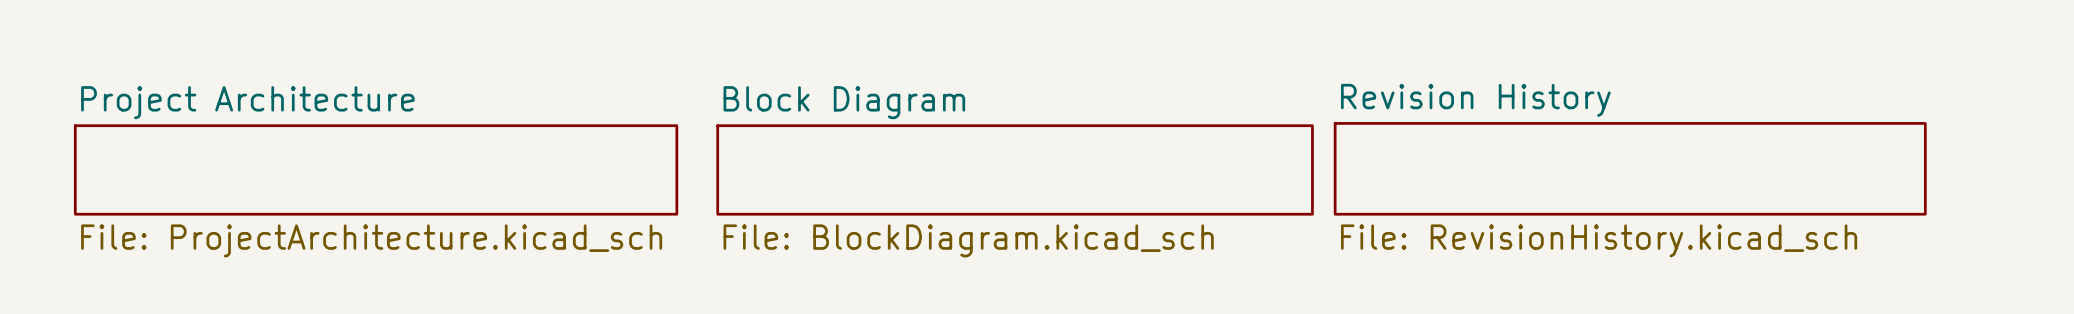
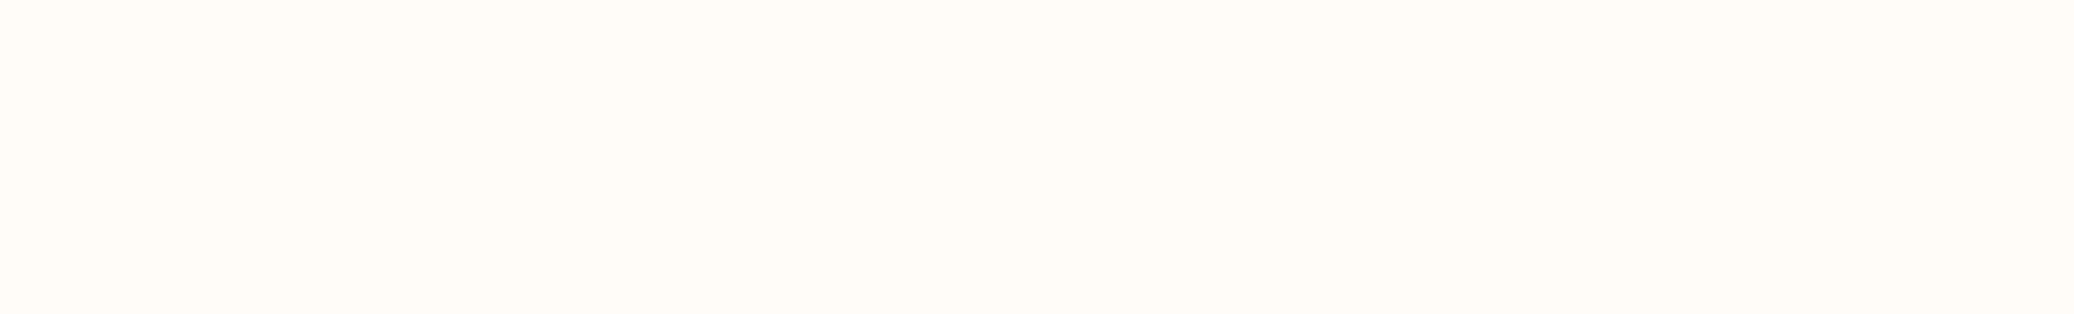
sheet Revision History: File: RevisionHistory.kicad_sch (1630, 168) -> none
sheet Project Architecture: File: ProjectArchitecture.kicad_sch (376, 169) -> none
sheet Block Diagram: File: BlockDiagram.kicad_sch (1015, 169) -> none

